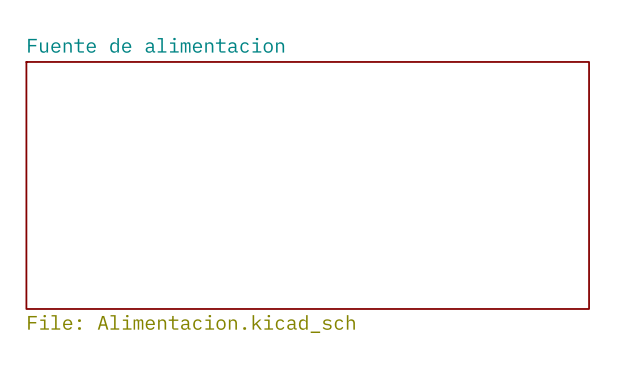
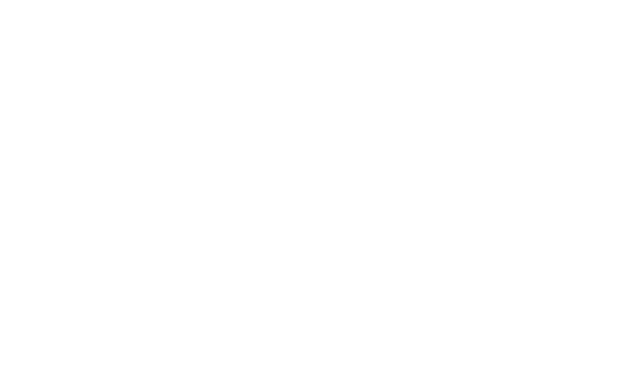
sheet Fuente de alimentacion: File: Alimentacion.kicad_sch (307, 185) -> none

